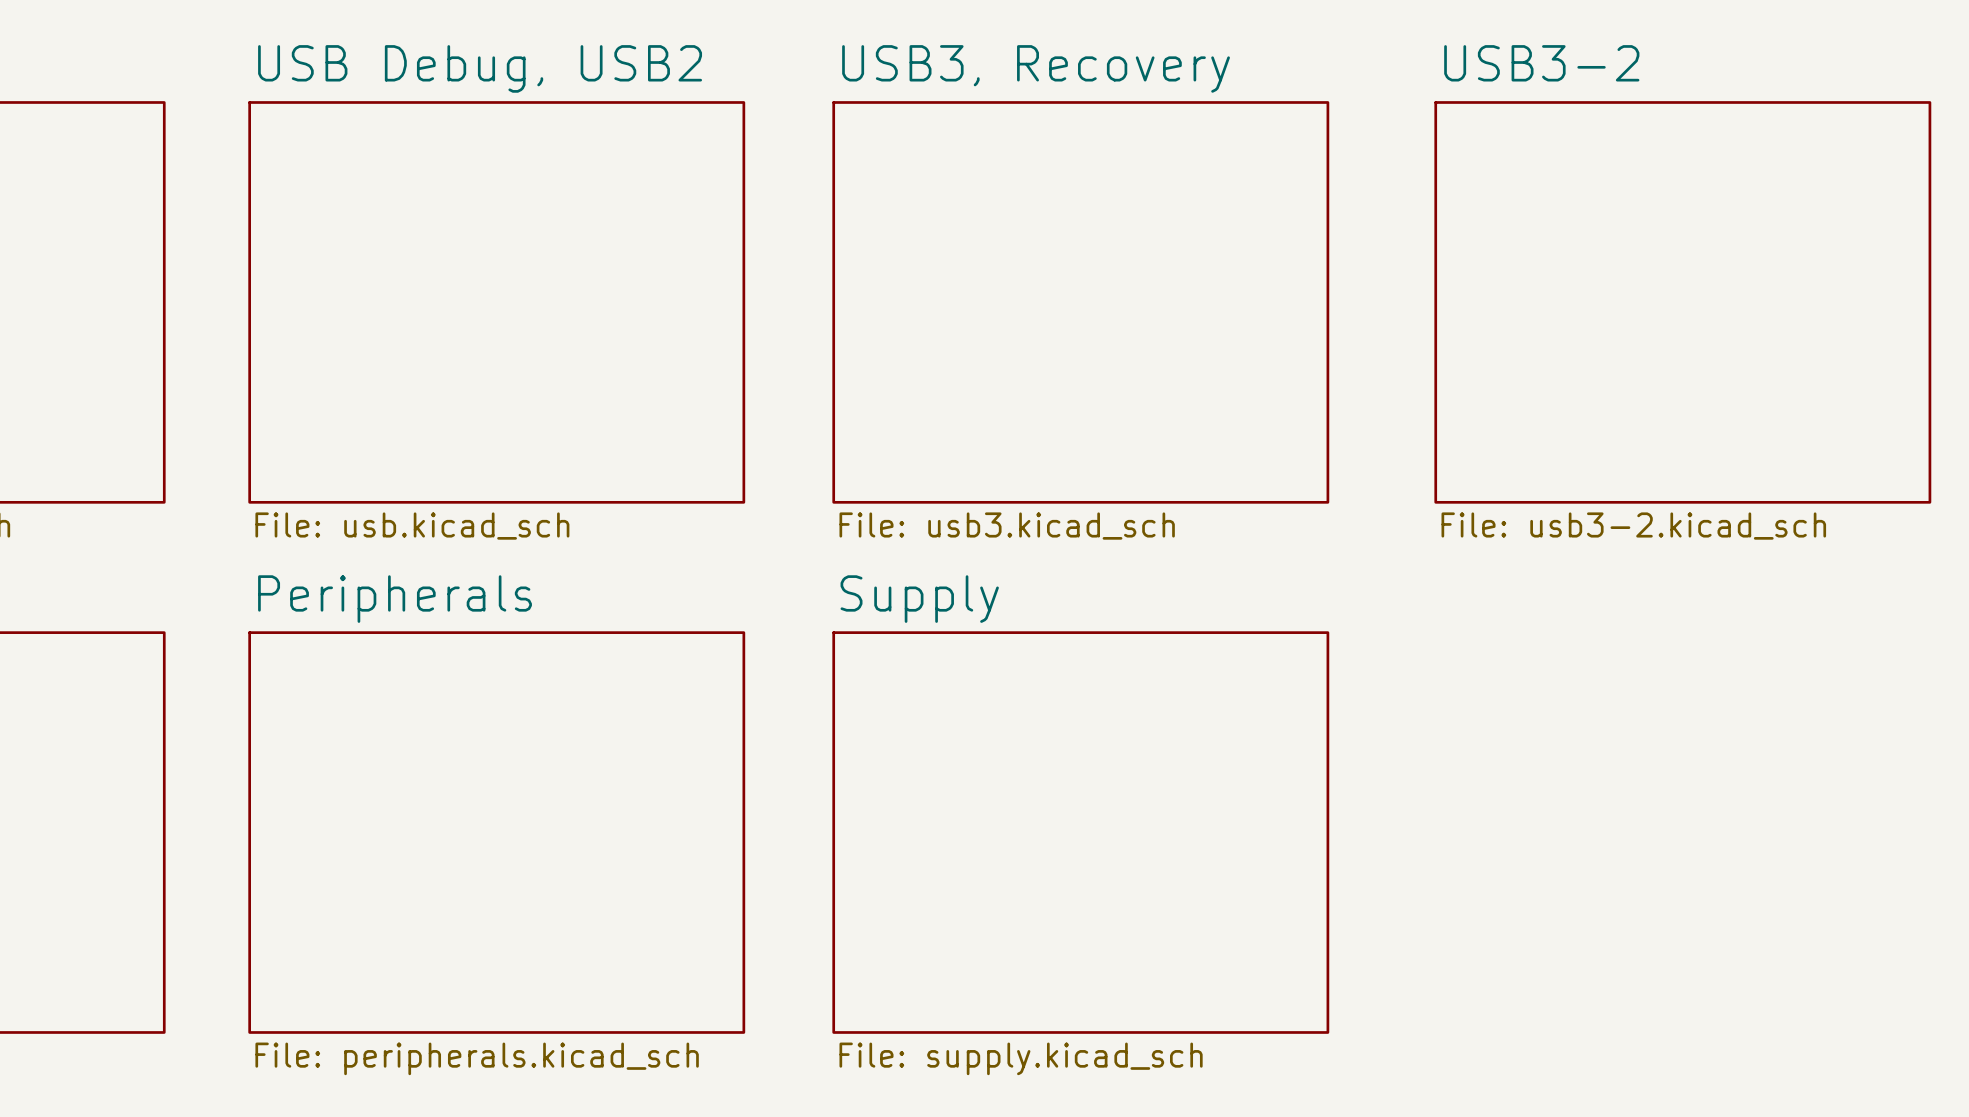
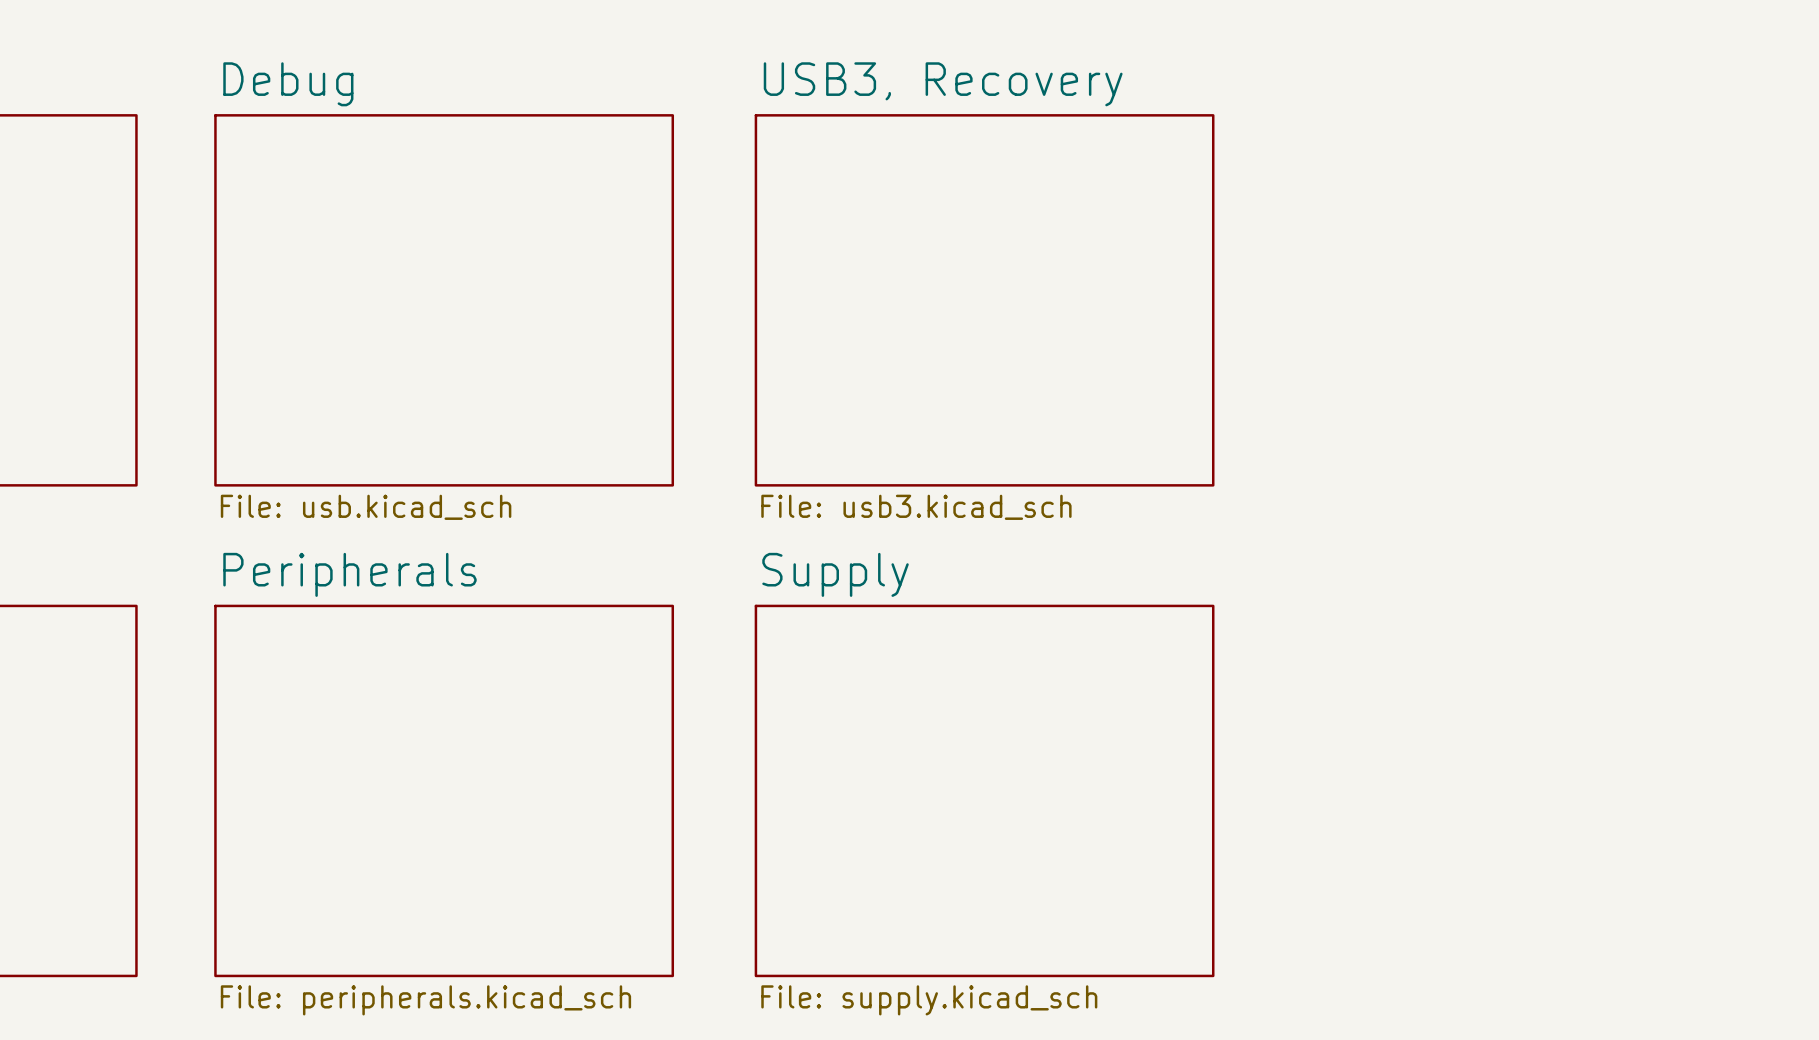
sheet USB Debug, USB2 name: USB Debug, USB2 (480, 68) -> Debug (288, 84)
sheet USB3-2: File: usb3-2.kicad_sch (1682, 302) -> none

